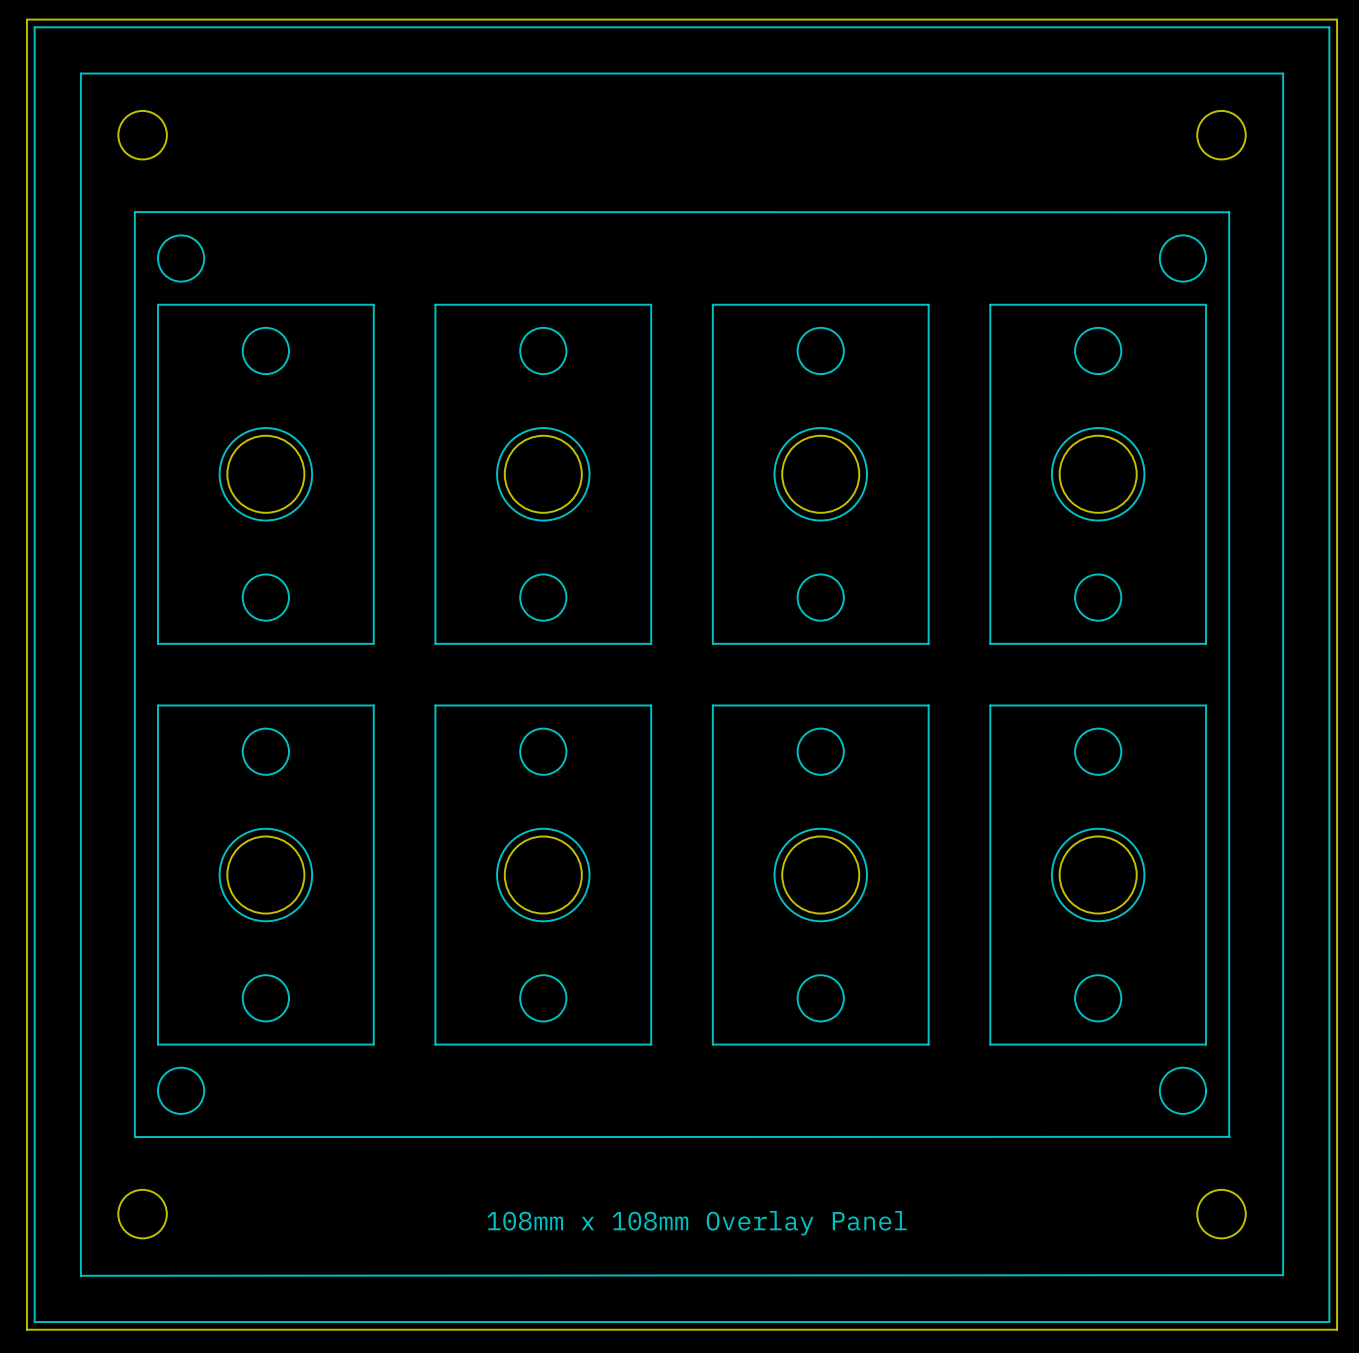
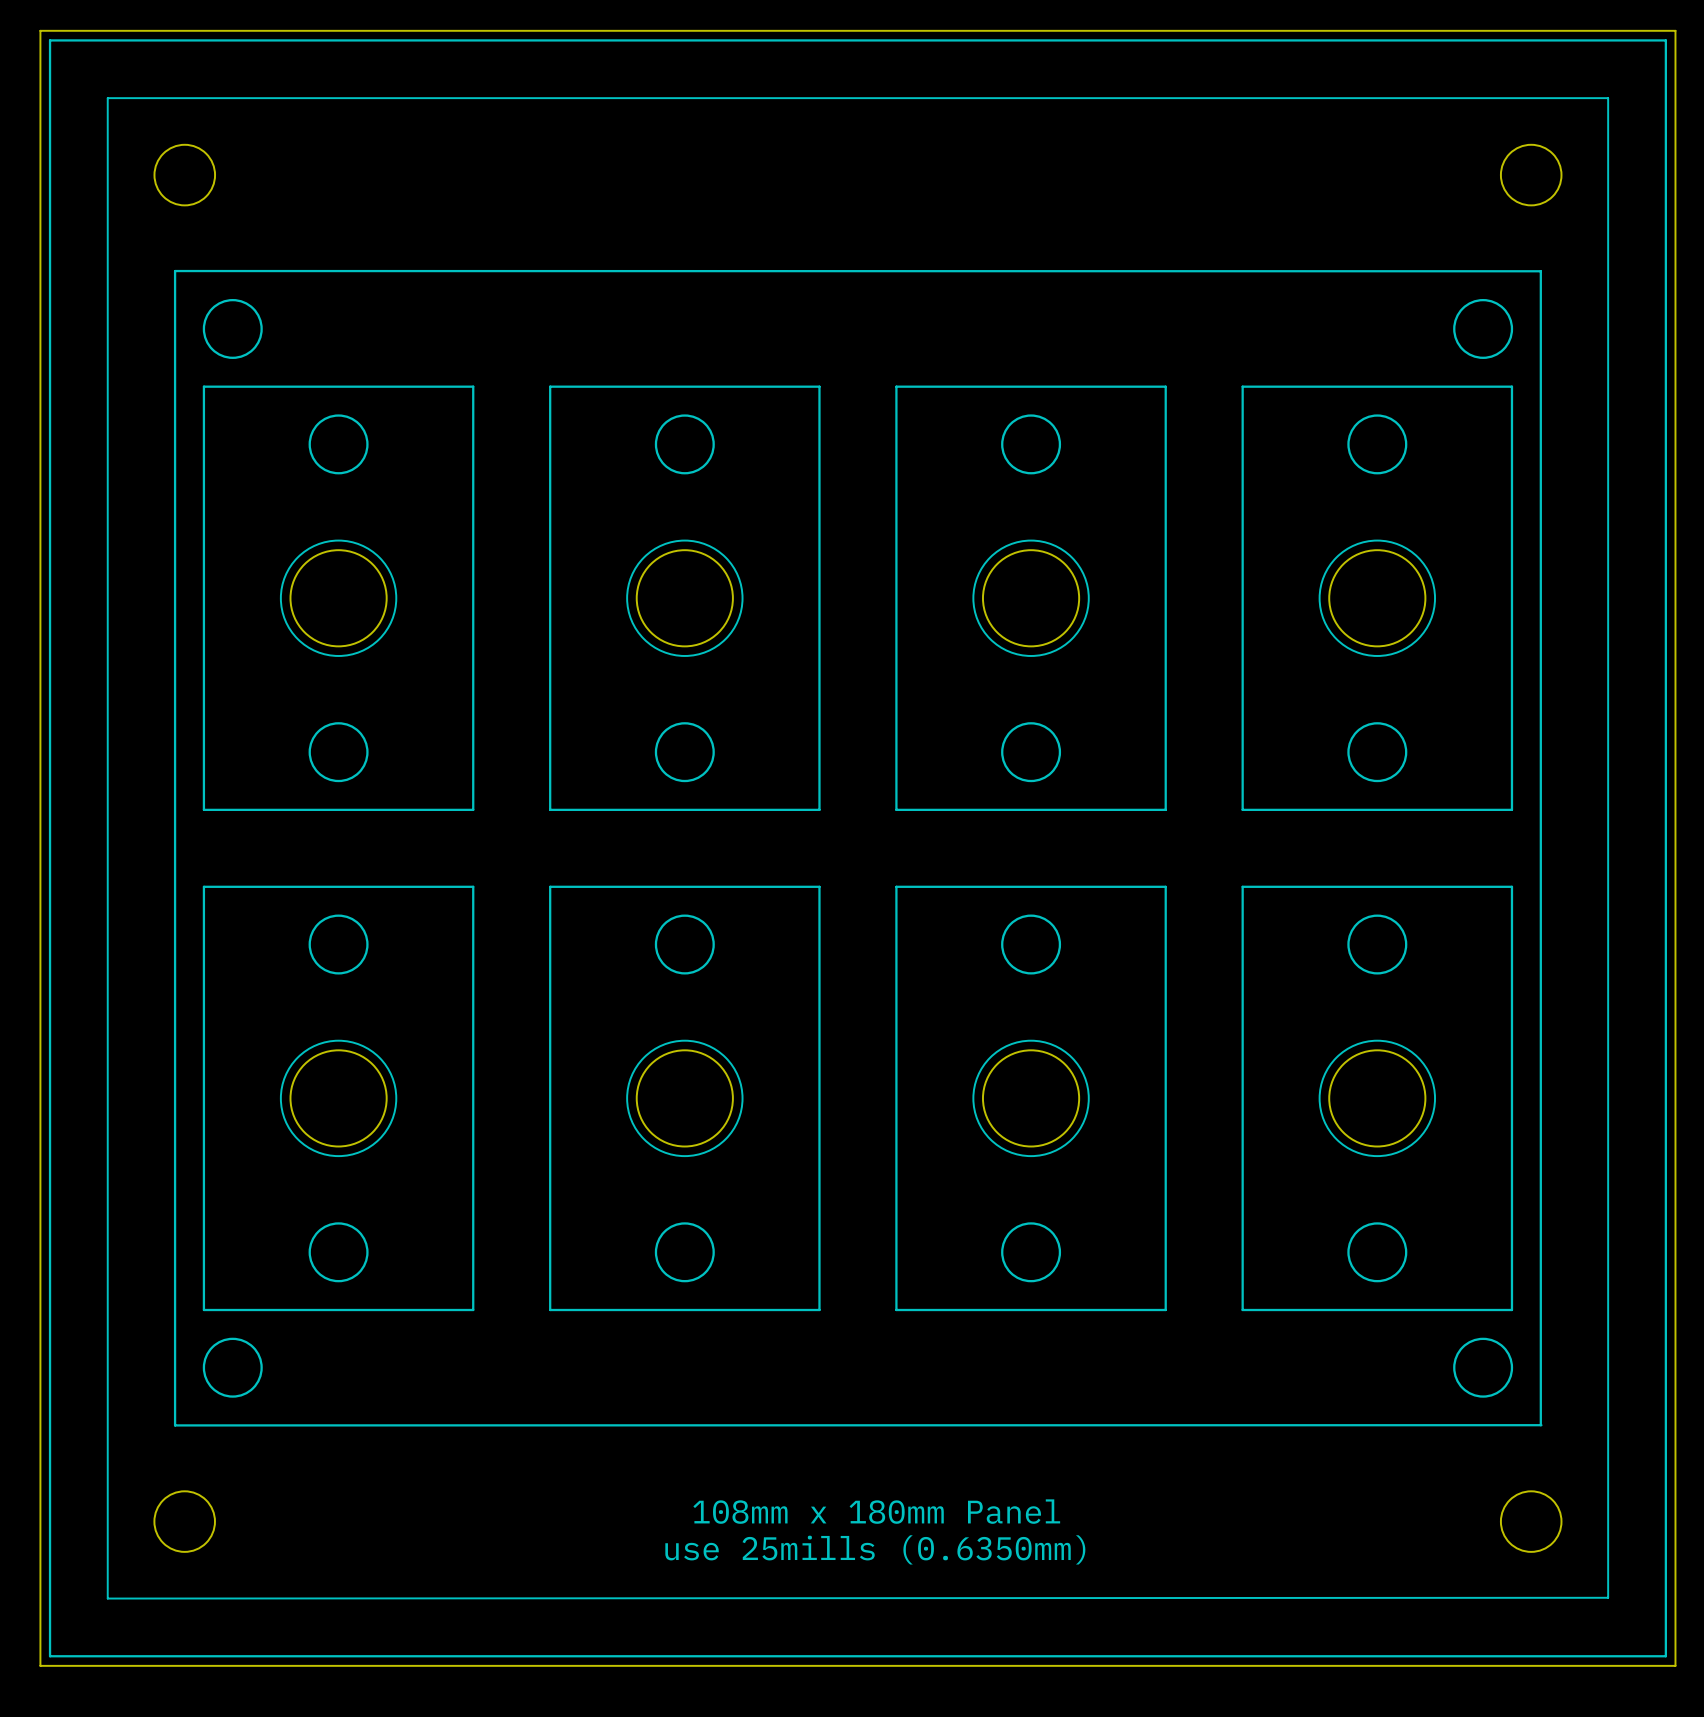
text: 108mm x 108mm Overlay Panel (697, 1223) -> 108mm x 180mm Panel (876, 1511)
text: none -> use 25mills (0.6350mm) (875, 1549)

